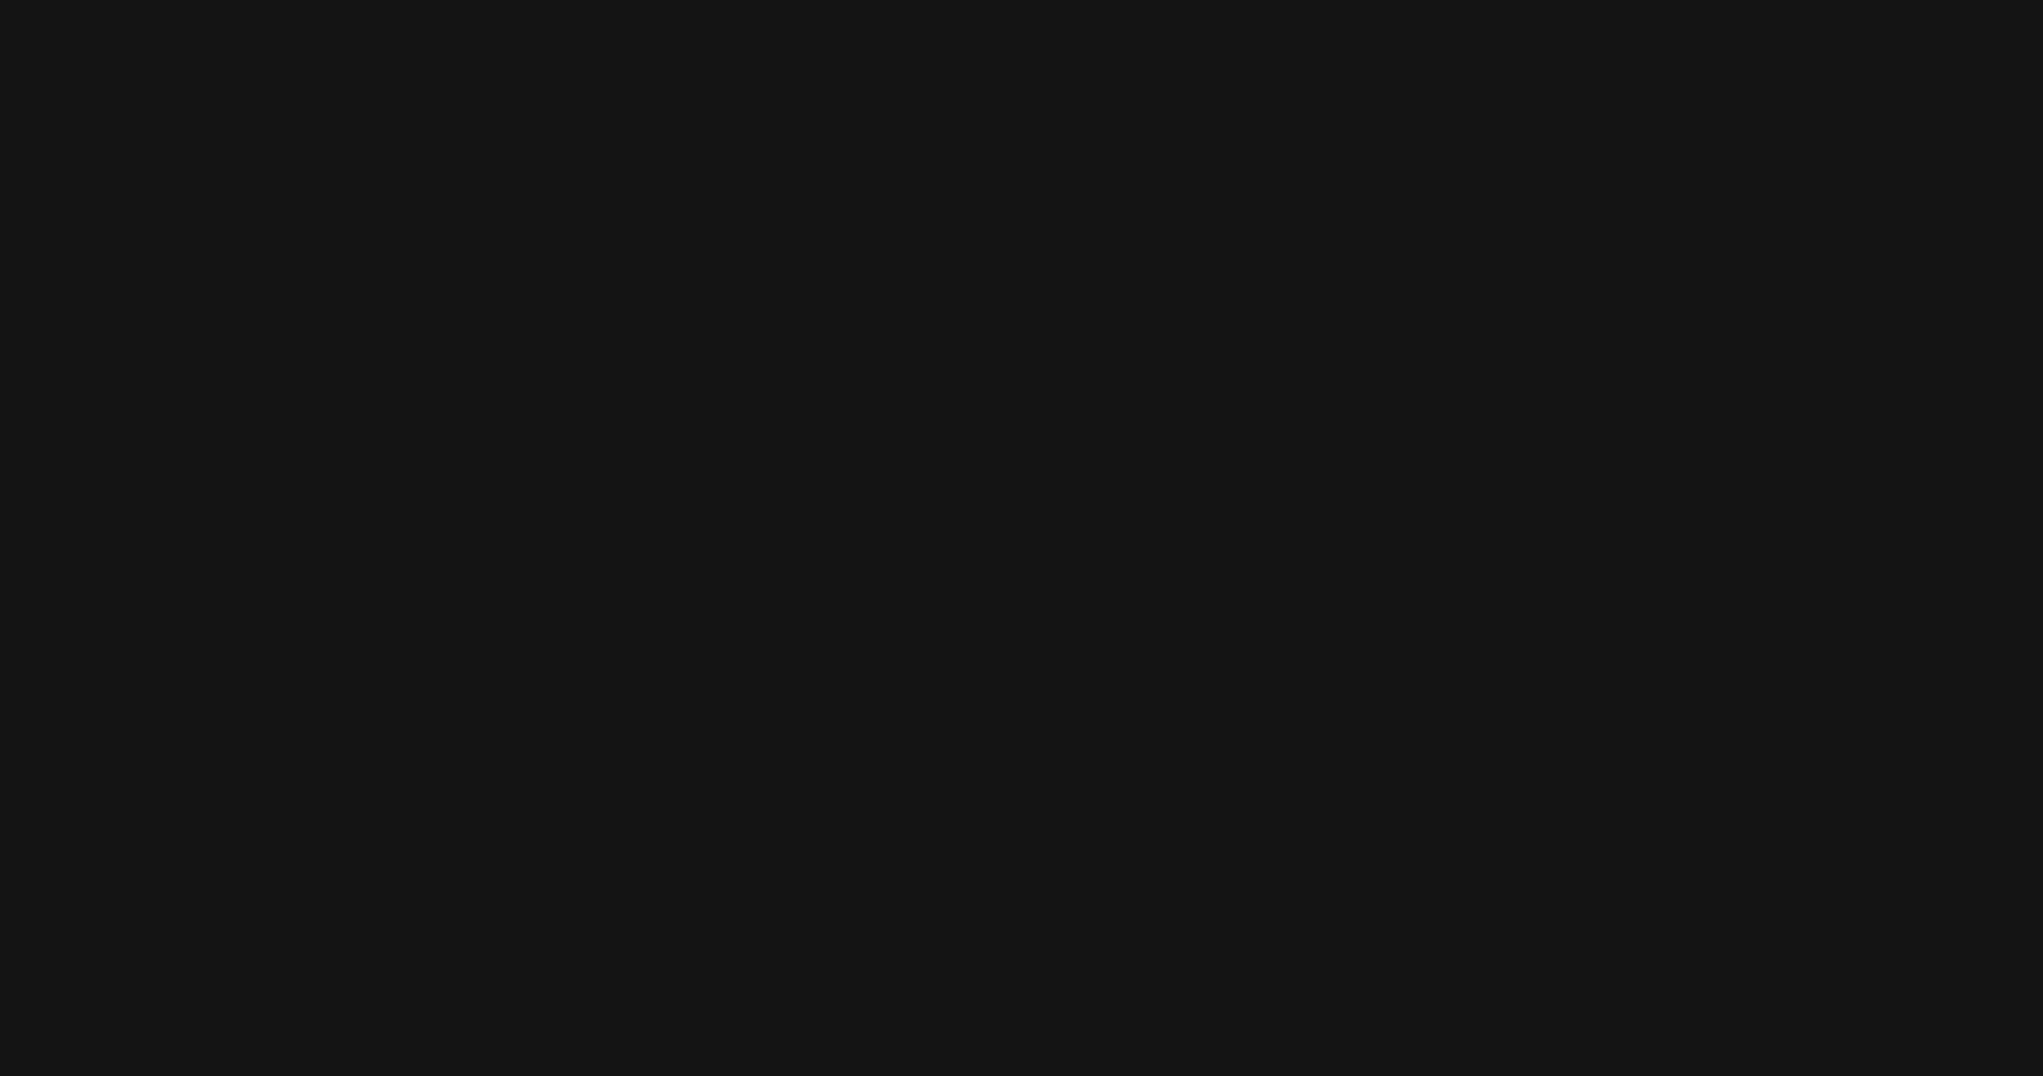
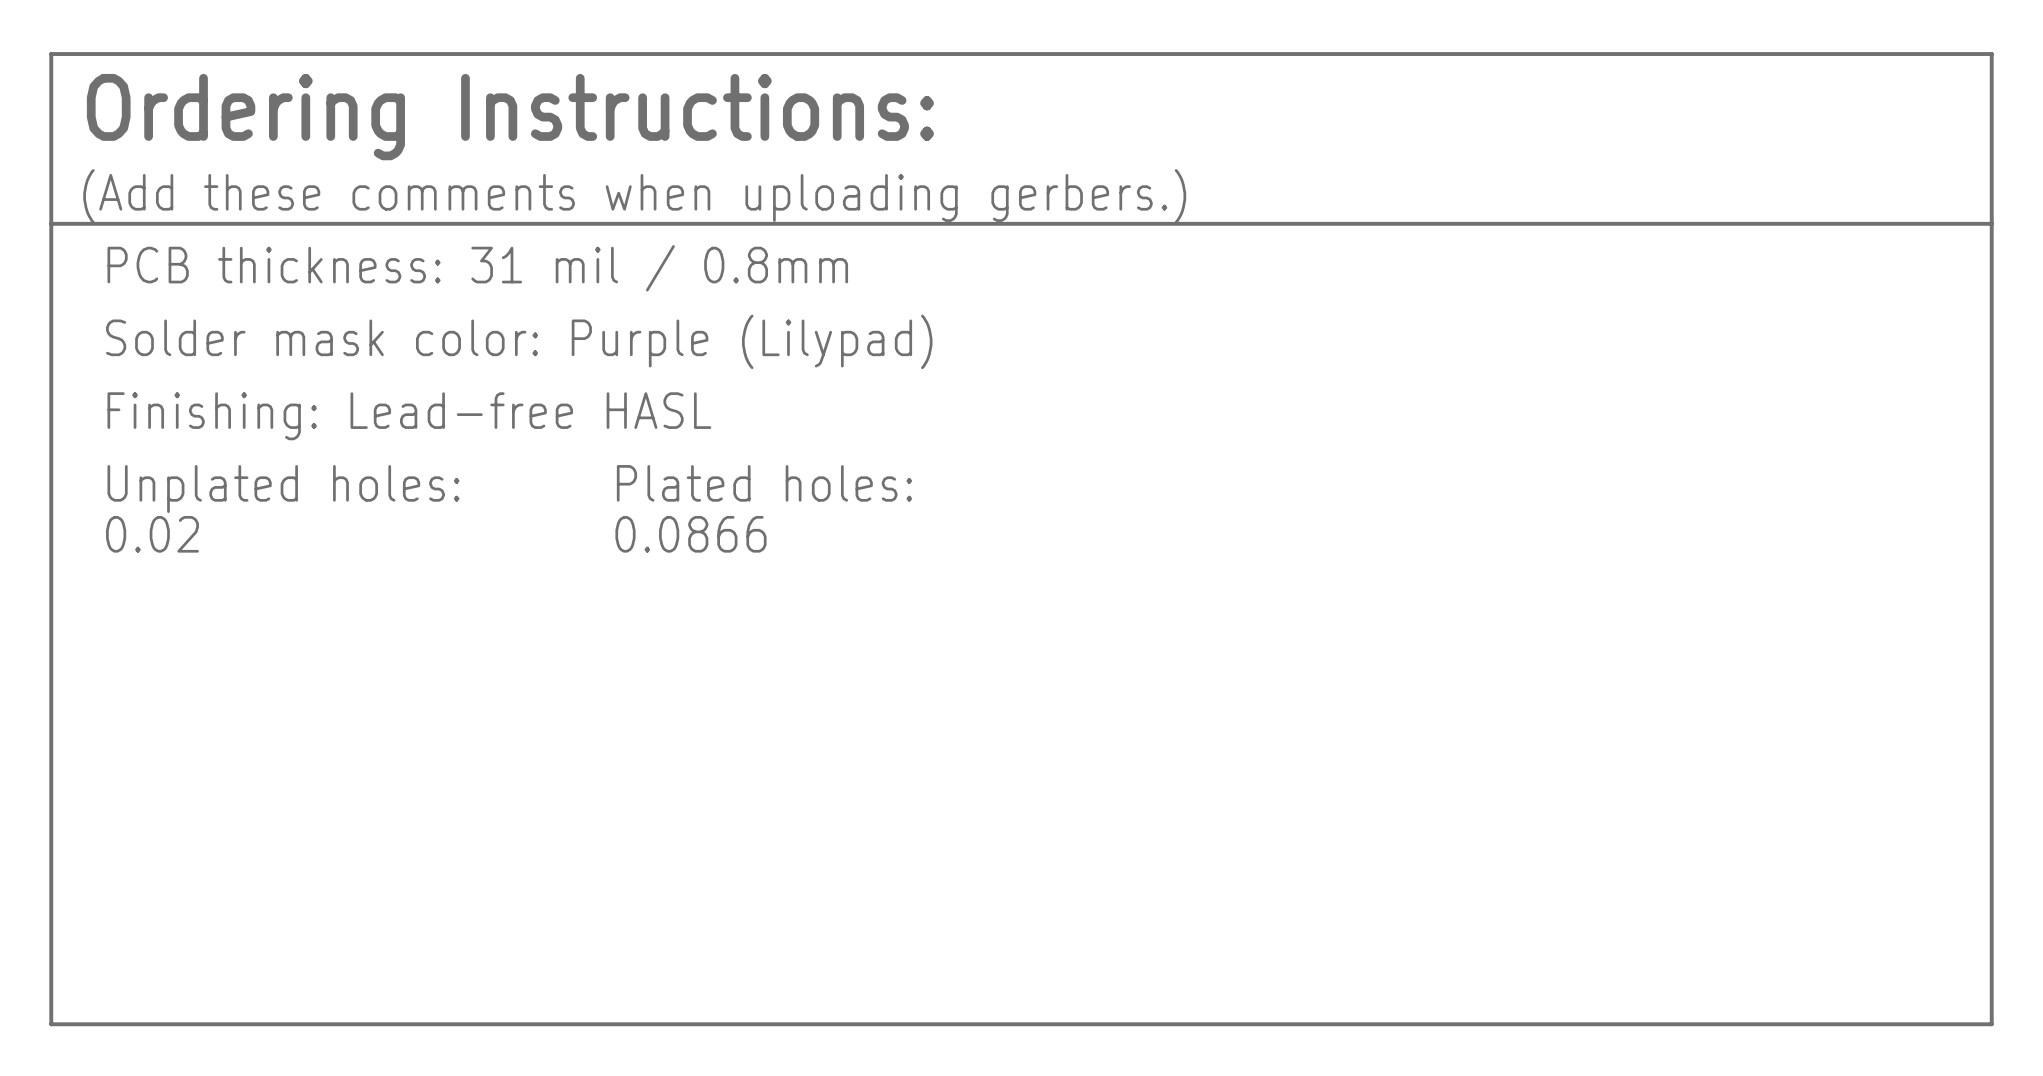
drawing: none -> [49, 52, 1994, 1027]
text: none -> PCB thickness: 31 mil / 0.8mm (477, 268)
text: none -> Solder mask color: Purple (Lilypad) (519, 341)
text: none -> Finishing: Lead-free HASL (409, 416)
text: none -> Plated holes: (764, 483)
text: none -> Unplated holes: (283, 489)
text: none -> 0.02 (152, 534)
text: none -> 0.0866 (690, 534)

